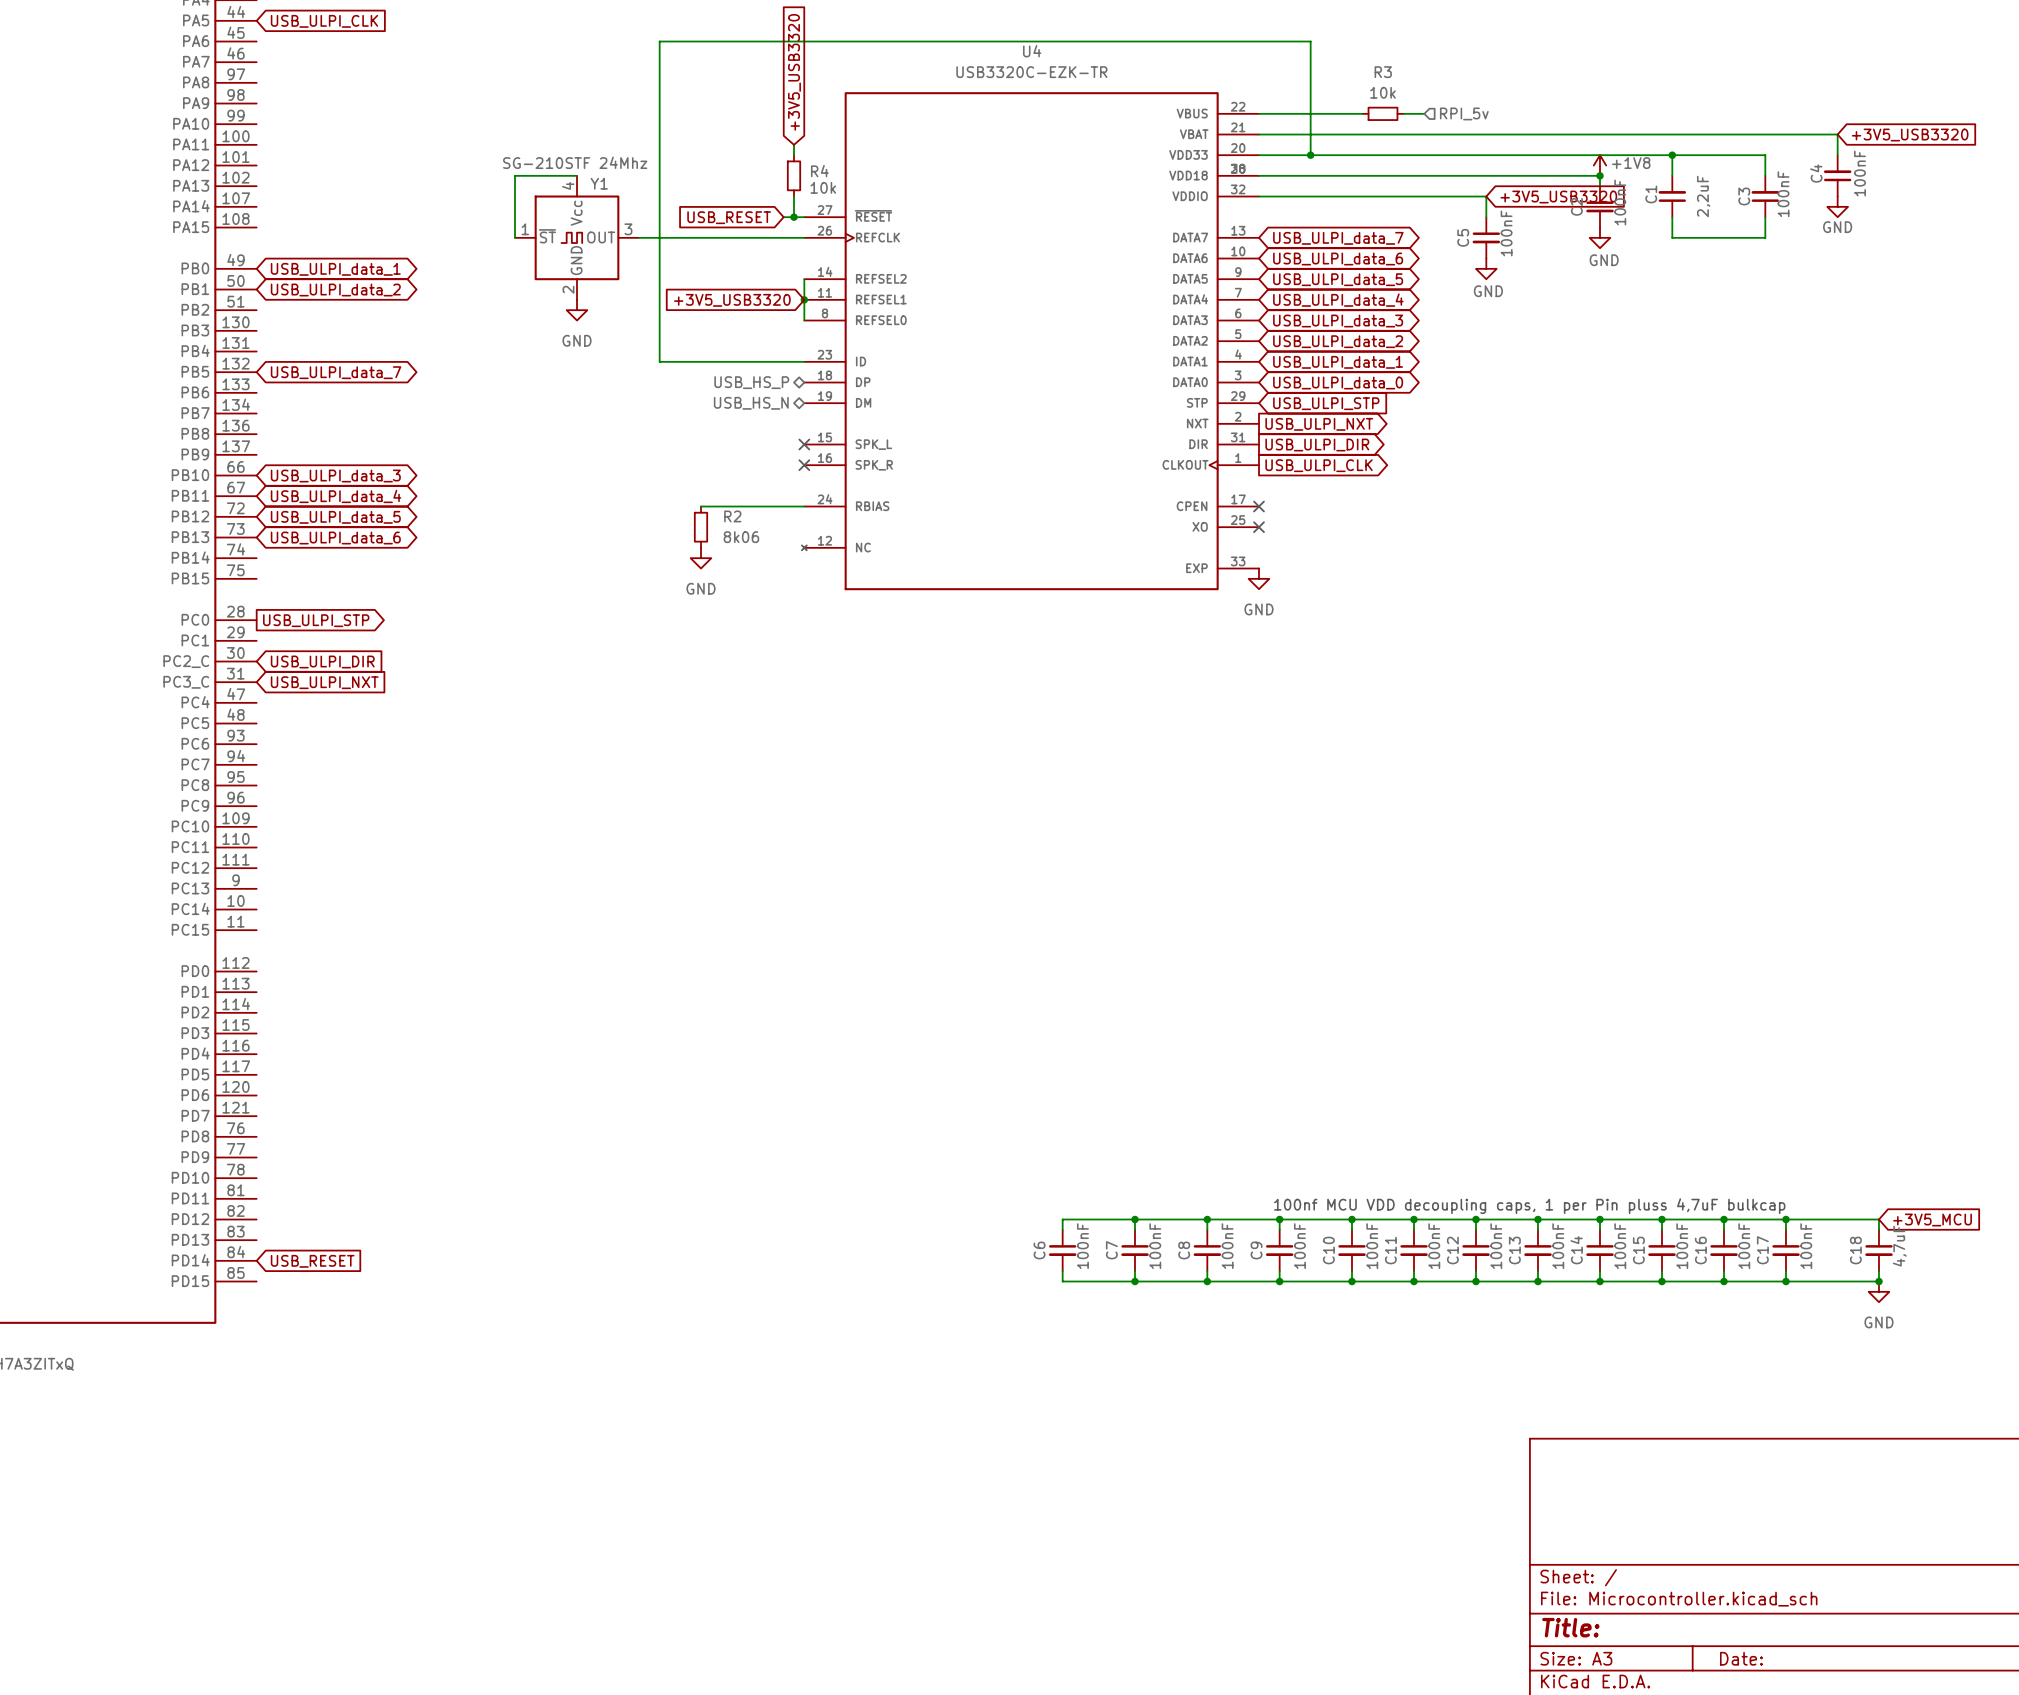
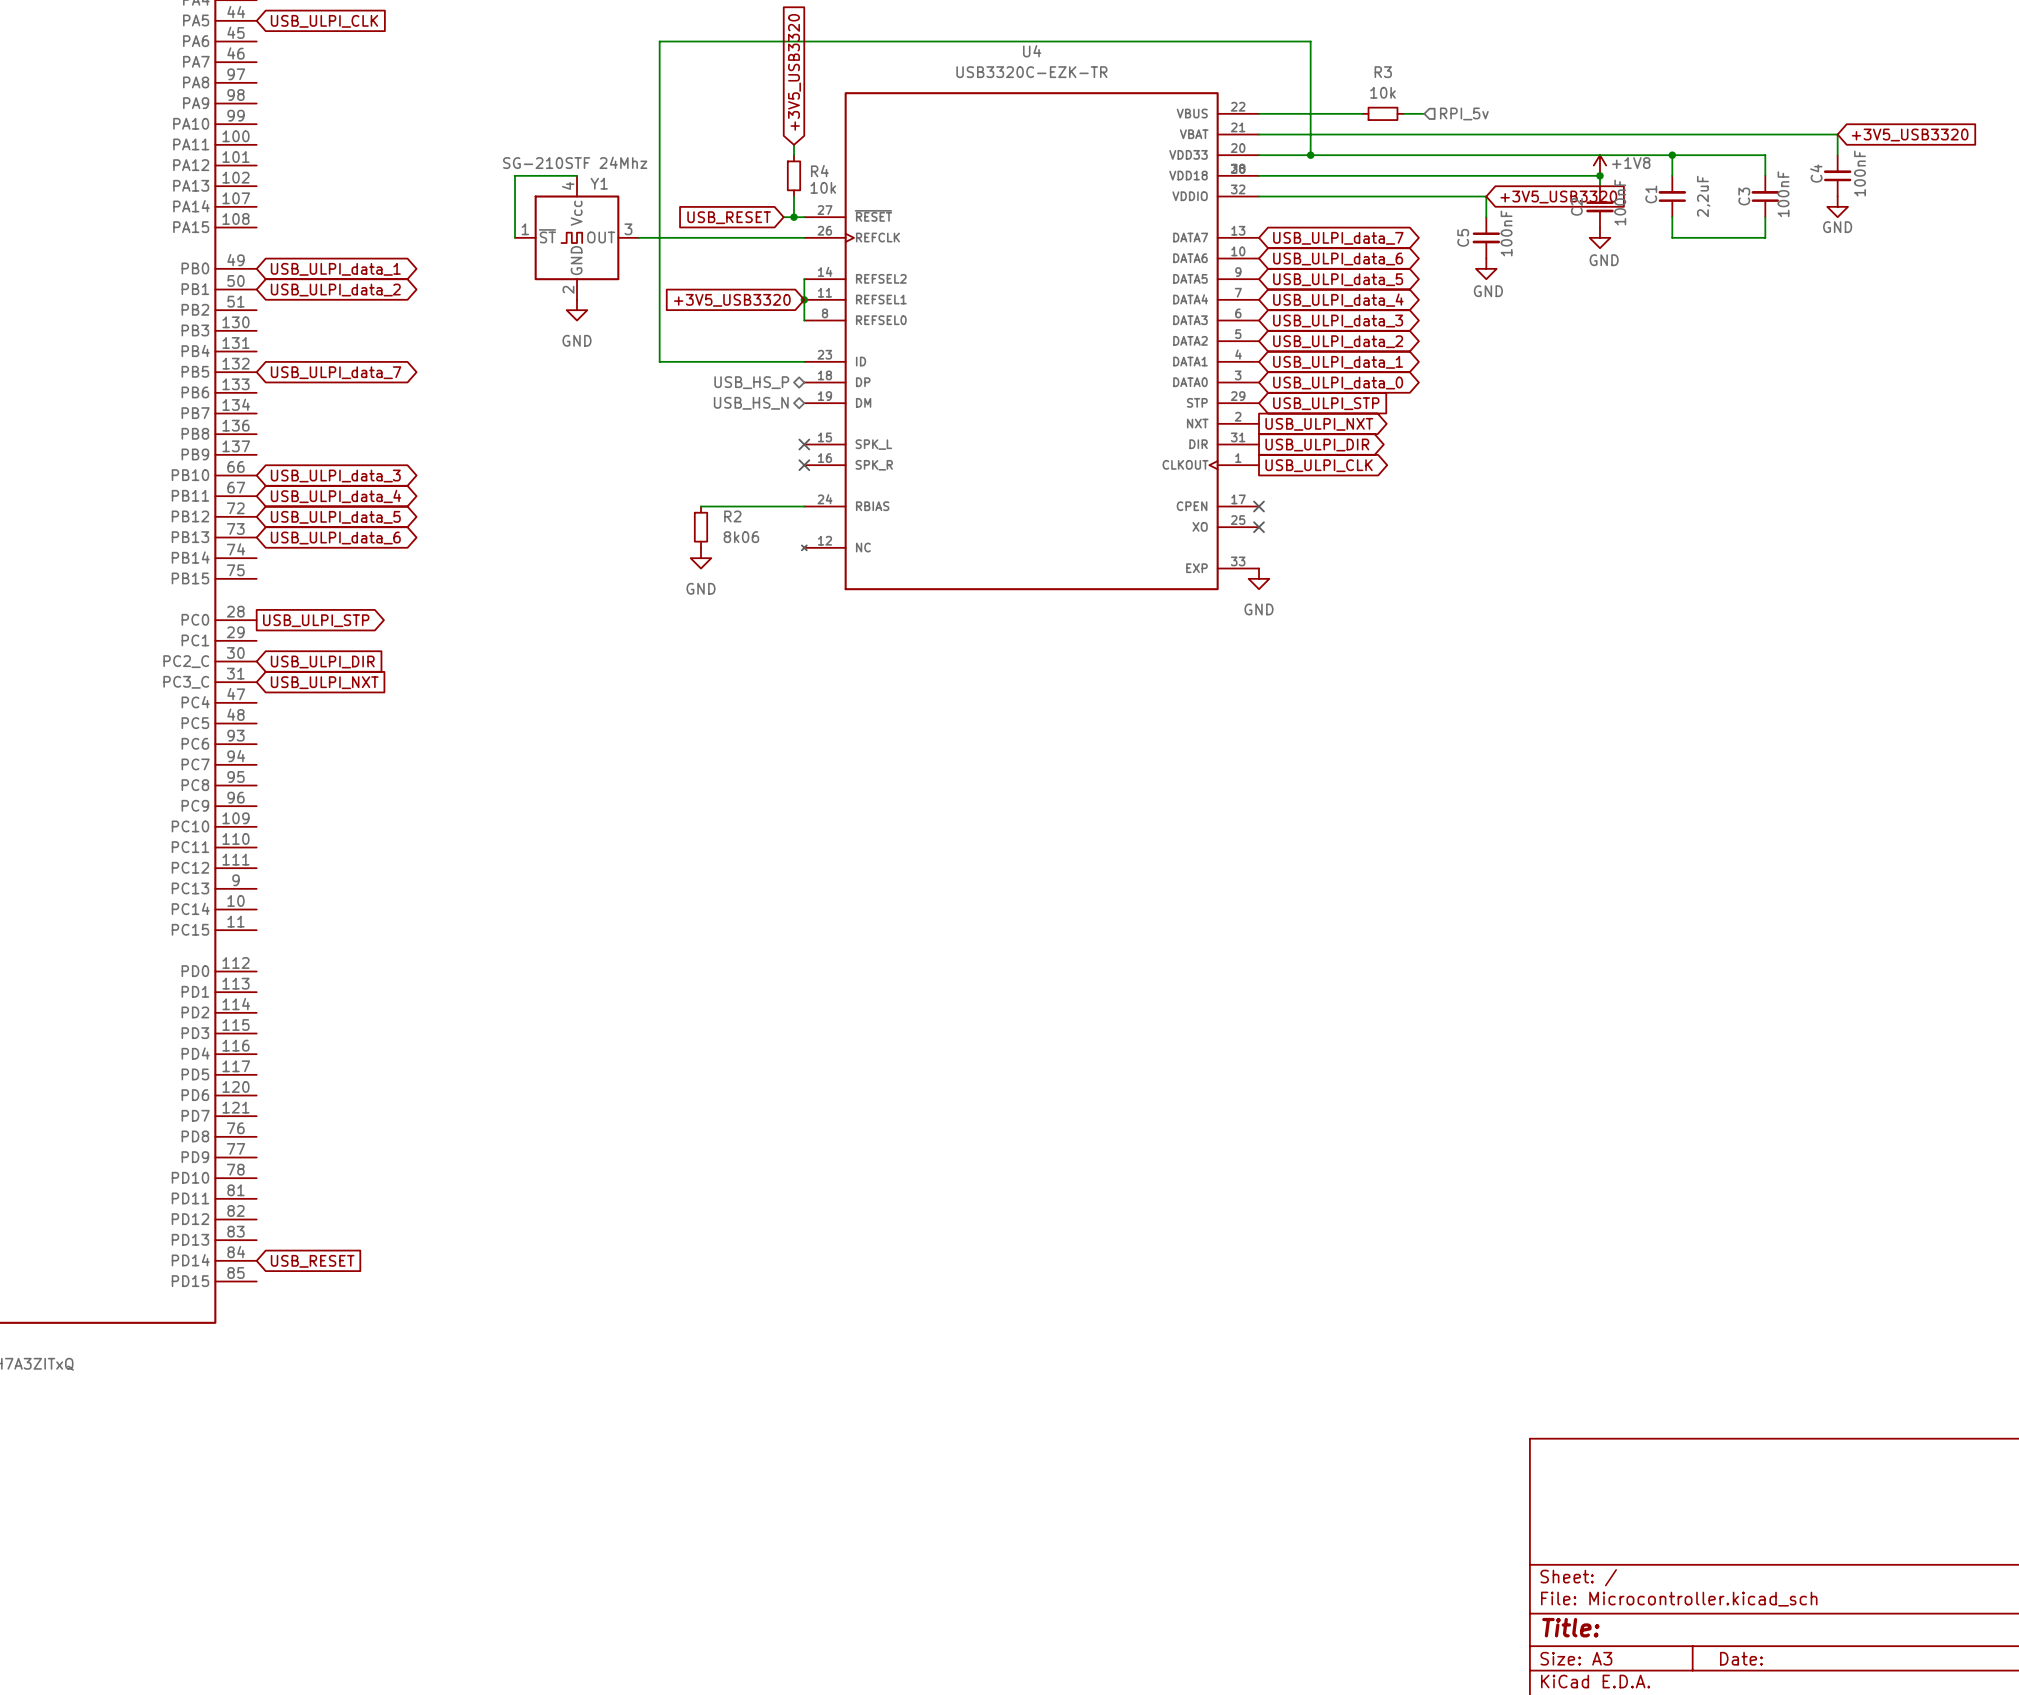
text: 100nf MCU VDD decoupling caps, 1 per Pin pluss 4,7uF bulkcap (1529, 1206) -> none
wire: (1134, 1219) (1134, 1229) -> none
junction: (1134, 1219) -> none
wire: (1207, 1219) (1207, 1229) -> none
junction: (1207, 1219) -> none
wire: (1279, 1219) (1279, 1229) -> none
junction: (1279, 1219) -> none
wire: (1351, 1219) (1351, 1229) -> none
junction: (1351, 1219) -> none
wire: (1413, 1219) (1413, 1229) -> none
junction: (1413, 1219) -> none
wire: (1475, 1219) (1475, 1229) -> none
junction: (1475, 1219) -> none
wire: (1537, 1219) (1537, 1229) -> none
junction: (1537, 1219) -> none
wire: (1599, 1219) (1599, 1229) -> none
junction: (1599, 1219) -> none
wire: (1661, 1219) (1661, 1229) -> none
junction: (1661, 1219) -> none
wire: (1723, 1219) (1723, 1229) -> none
junction: (1723, 1219) -> none
wire: (1785, 1219) (1785, 1229) -> none
junction: (1785, 1219) -> none
global label: +3V5_MCU (1932, 1220) -> none
wire: (1062, 1229) (1062, 1219) (1878, 1219) (1878, 1229) -> none
C6: 100nF (1062, 1250) -> none
C7: 100nF (1134, 1250) -> none
C8: 100nF (1207, 1250) -> none
C9: 100nF (1279, 1250) -> none
C10: 100nF (1351, 1250) -> none
C11: 100nF (1413, 1250) -> none
C12: 100nF (1475, 1250) -> none
C13: 100nF (1537, 1250) -> none
C14: 100nF (1599, 1250) -> none
C15: 100nF (1661, 1250) -> none
C16: 100nF (1723, 1250) -> none
C17: 100nF (1785, 1250) -> none
C18: 4,7uF (1878, 1250) -> none
wire: (1062, 1271) (1062, 1281) (1878, 1281) (1878, 1271) -> none
wire: (1134, 1271) (1134, 1281) -> none
wire: (1207, 1271) (1207, 1281) -> none
wire: (1279, 1271) (1279, 1281) -> none
wire: (1351, 1271) (1351, 1281) -> none
wire: (1413, 1271) (1413, 1281) -> none
wire: (1475, 1271) (1475, 1281) -> none
wire: (1537, 1271) (1537, 1281) -> none
wire: (1599, 1271) (1599, 1281) -> none
wire: (1661, 1271) (1661, 1281) -> none
wire: (1723, 1271) (1723, 1281) -> none
wire: (1785, 1271) (1785, 1281) -> none
junction: (1134, 1281) -> none
junction: (1207, 1281) -> none
junction: (1279, 1281) -> none
junction: (1351, 1281) -> none
junction: (1413, 1281) -> none
junction: (1475, 1281) -> none
junction: (1537, 1281) -> none
junction: (1599, 1281) -> none
junction: (1661, 1281) -> none
junction: (1723, 1281) -> none
junction: (1785, 1281) -> none
junction: (1878, 1281) -> none
power symbol: GND (1878, 1291) -> none

